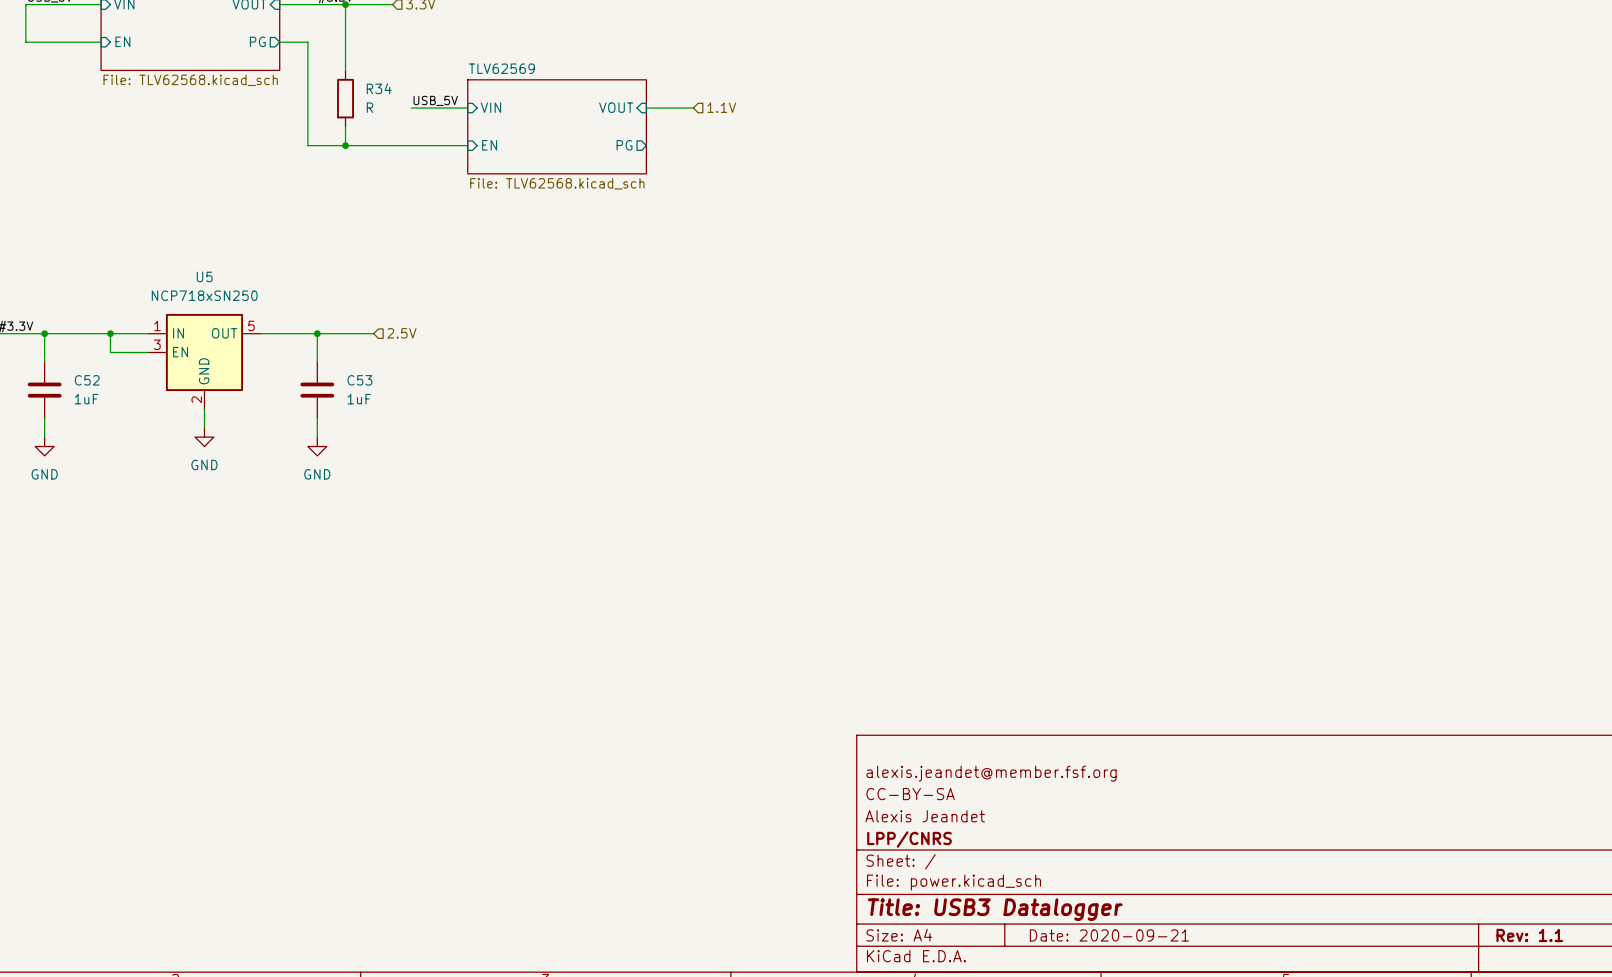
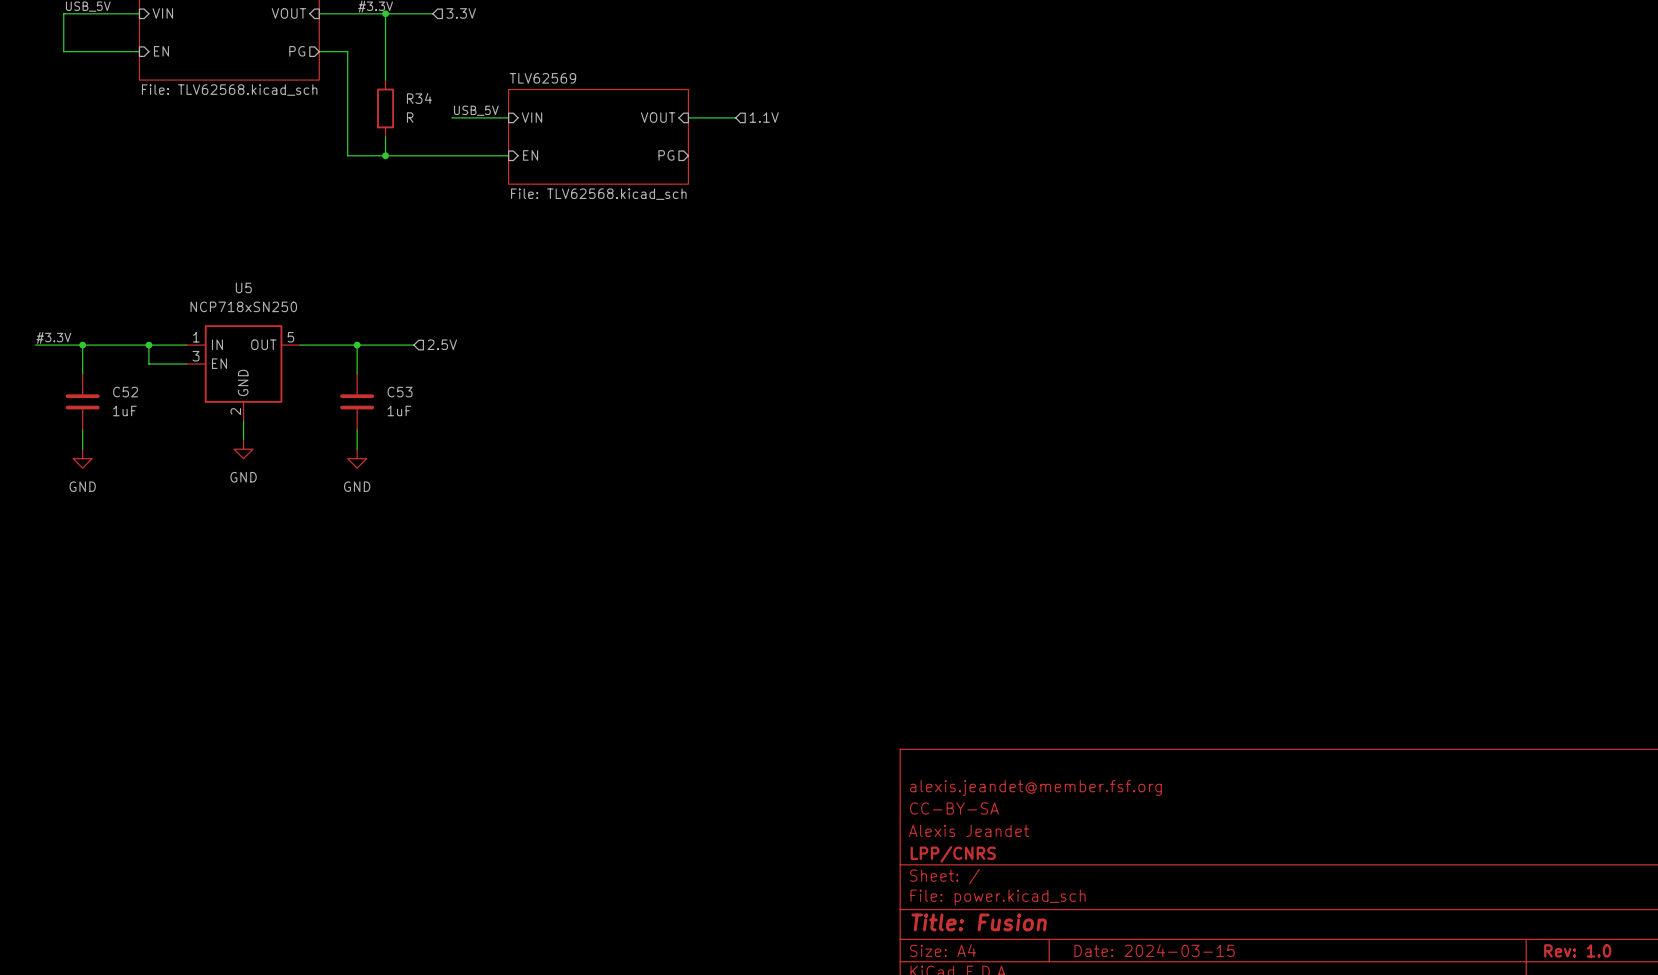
title block: Title: USB3 Datalogger (995, 909) -> Title: Fusion (979, 922)
title block: Date: 2020-09-21 (1109, 935) -> Date: 2024-03-15 (1154, 950)
title block: Rev: 1.1 (1529, 935) -> Rev: 1.0 (1577, 950)

